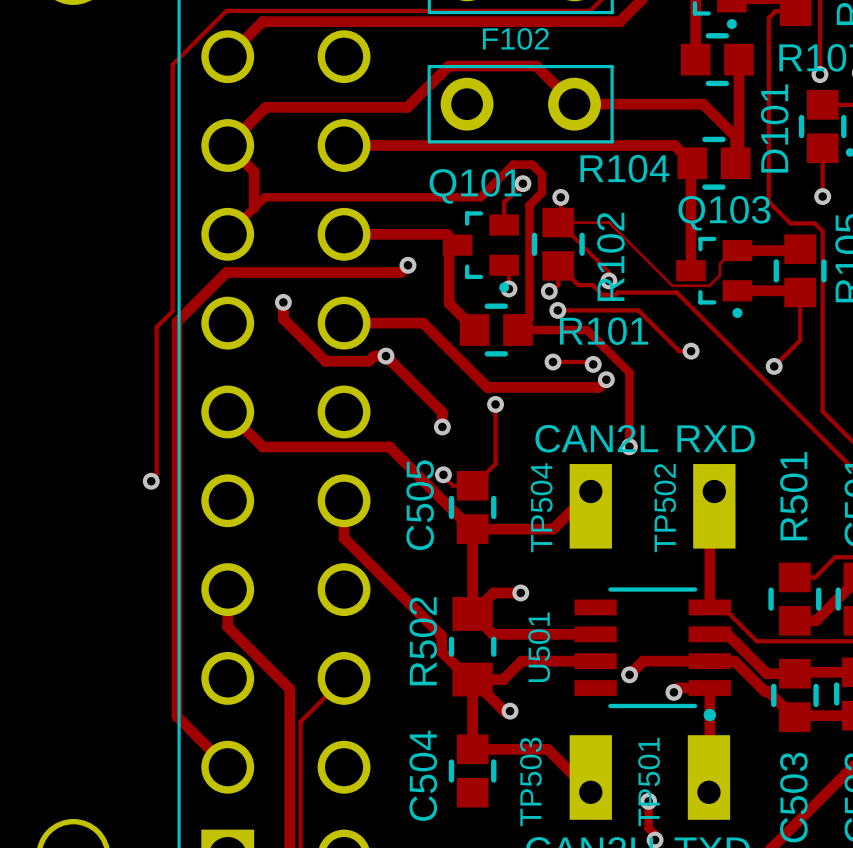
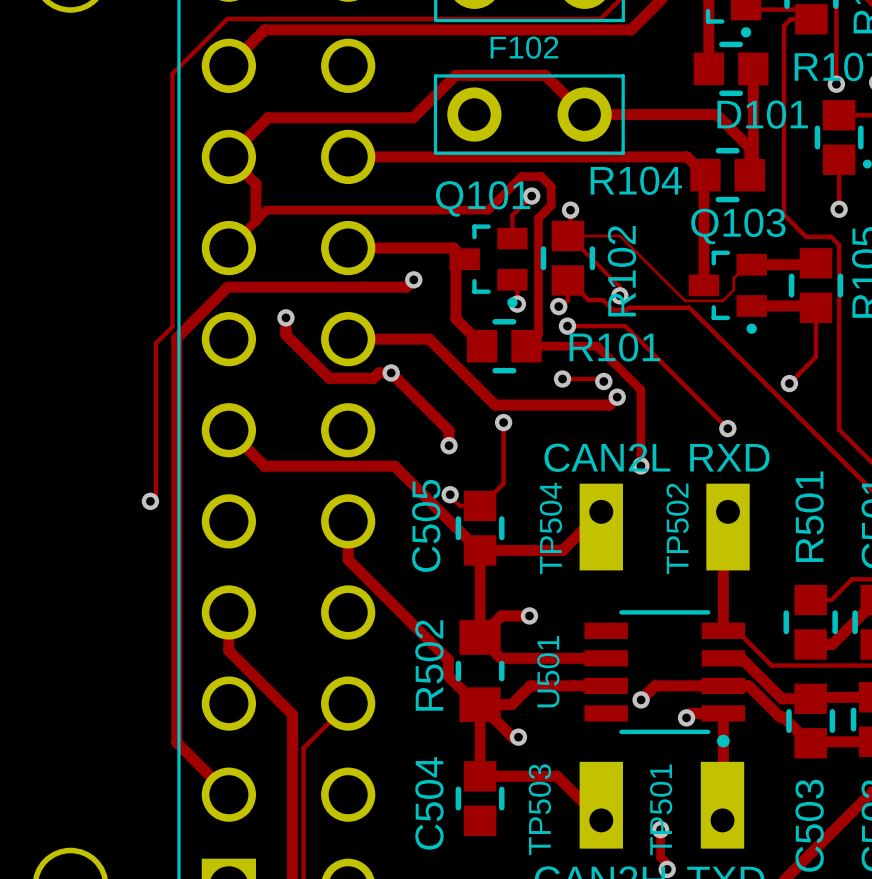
D101 name rotation: 0° (774, 128) -> 90° clockwise (762, 114)
track: (614, 310) (638, 310) (679, 351) (691, 351) -> (625, 326) (727, 428)
via position: (691, 351) -> (727, 428)

